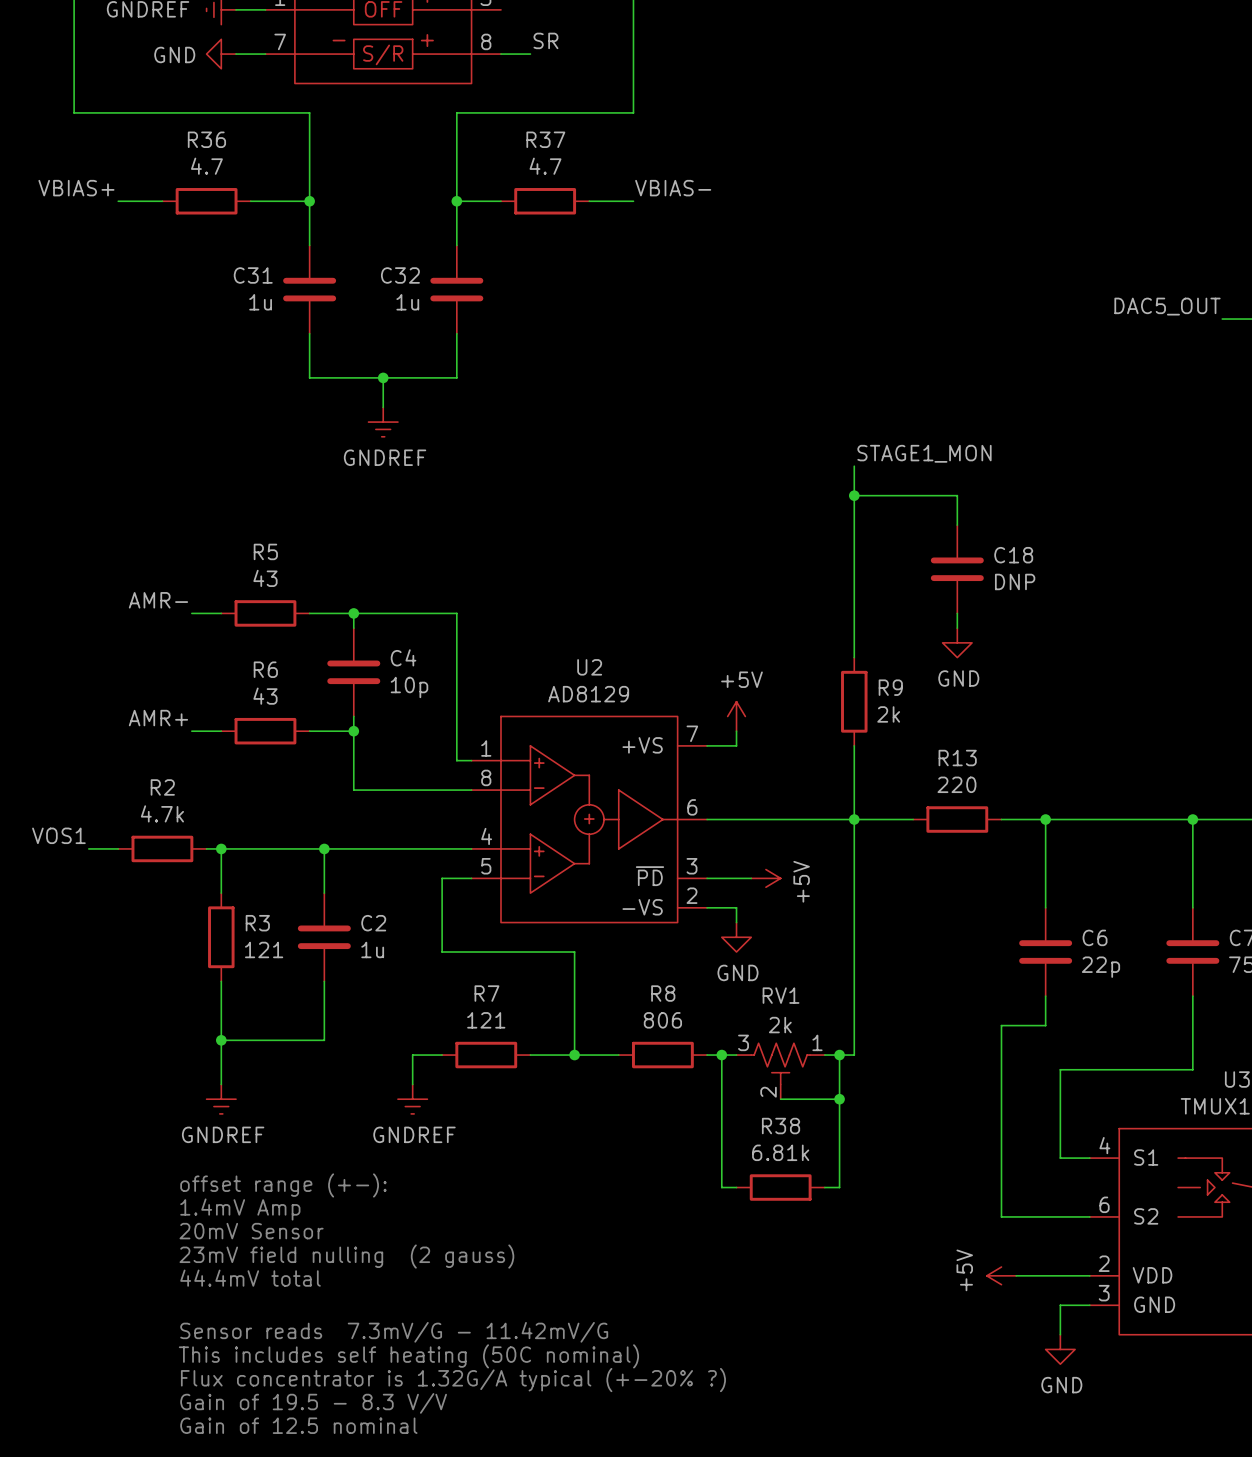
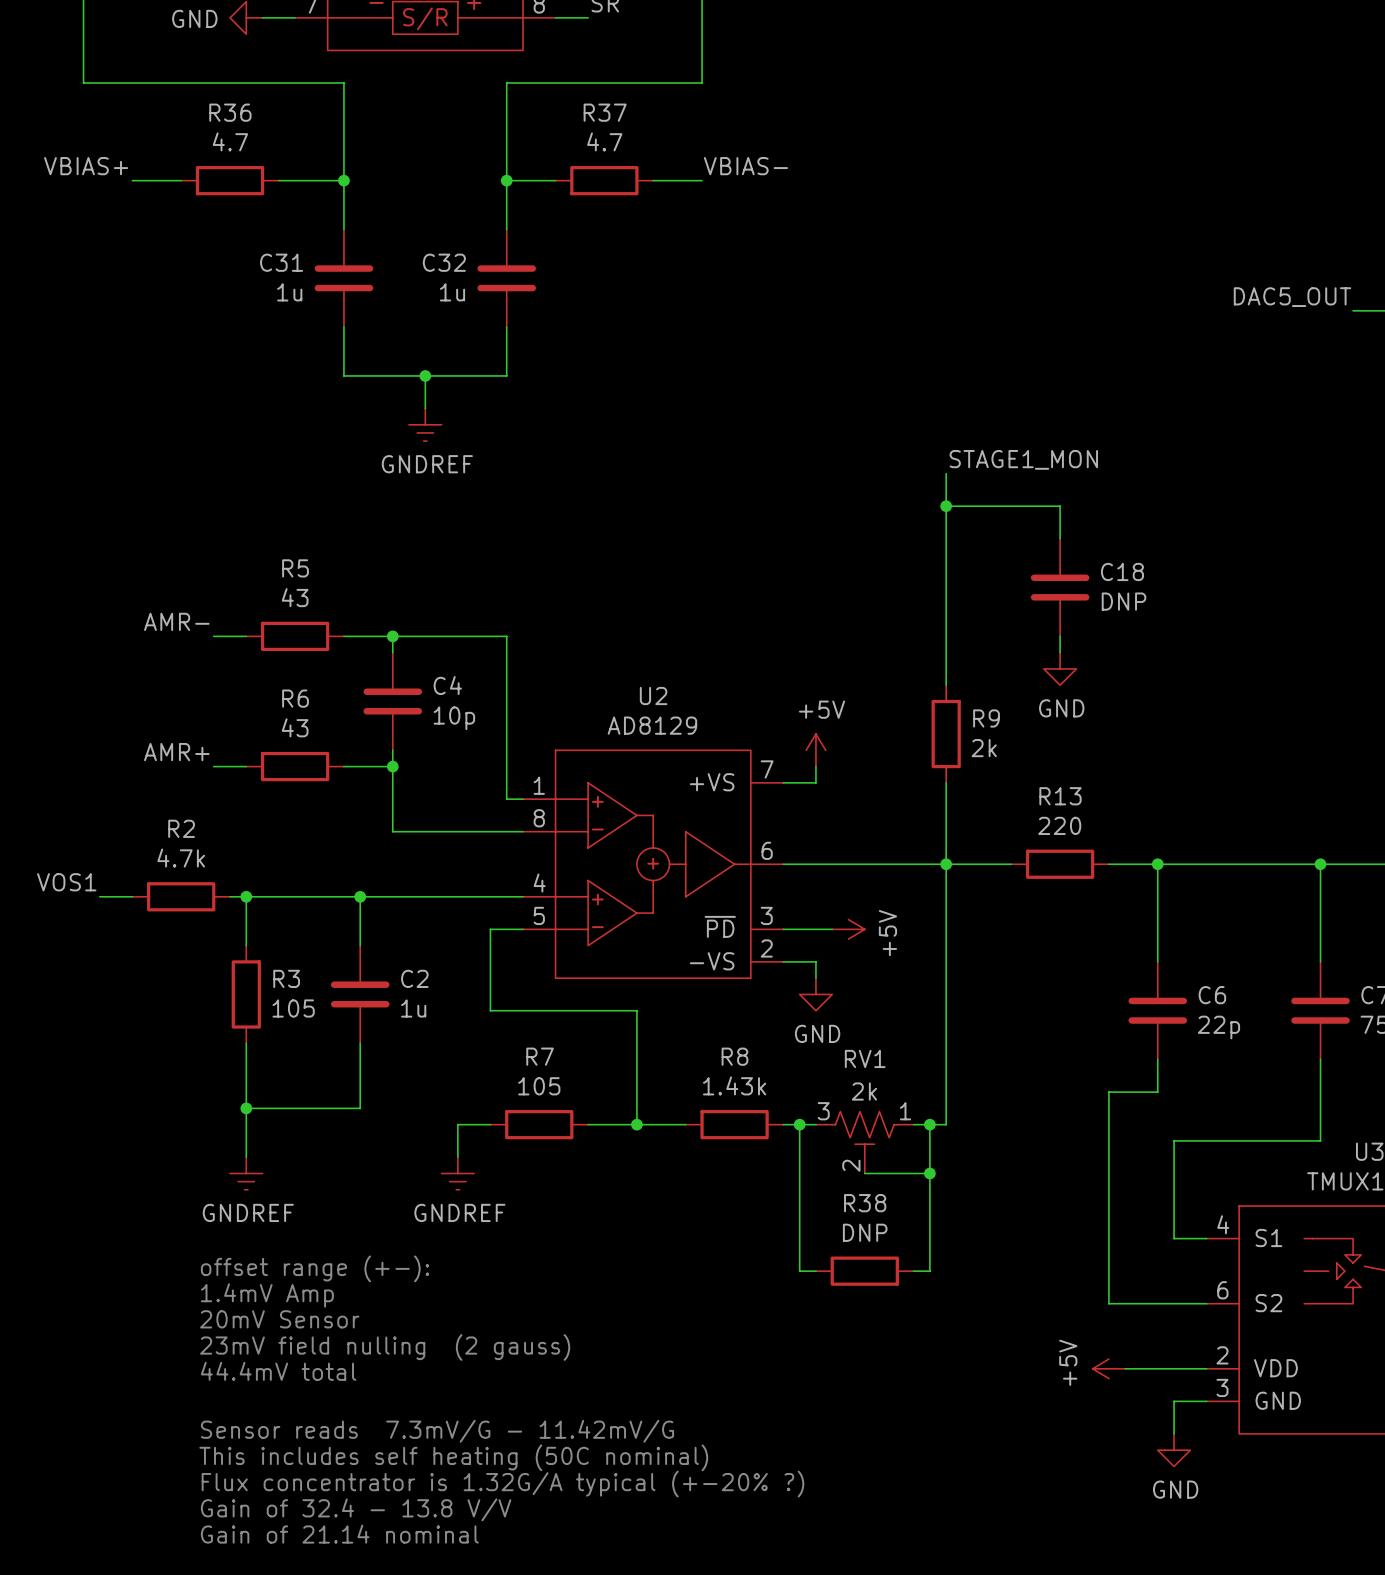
R3 value: 121 (264, 949) -> 105 (293, 1008)
R7 value: 121 (486, 1020) -> 105 (539, 1086)
R8 value: 806 (662, 1020) -> 1.43k (734, 1085)
R38 value: 6.81k (780, 1152) -> DNP (865, 1232)
text: Gain of 19.5 - 8.3 V/V (313, 1403) -> Gain of 32.4 - 13.8 V/V (356, 1509)
text: Gain of 12.5 nominal (298, 1425) -> Gain of 21.14 nominal (339, 1534)

